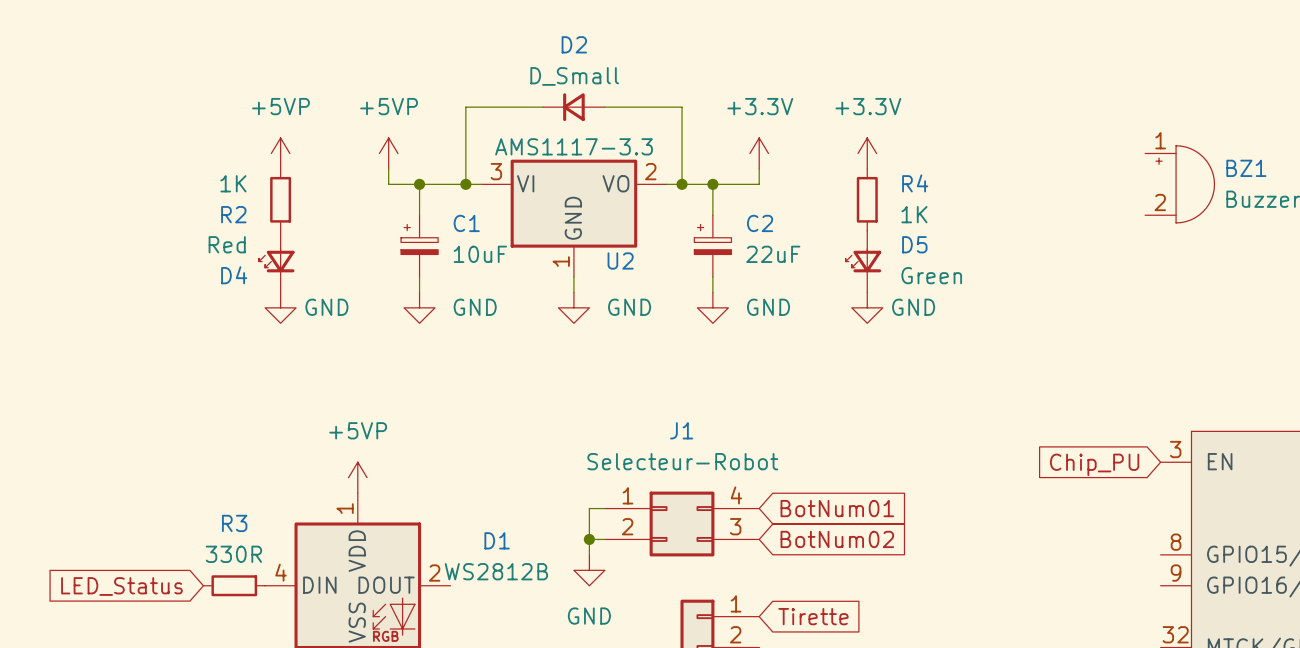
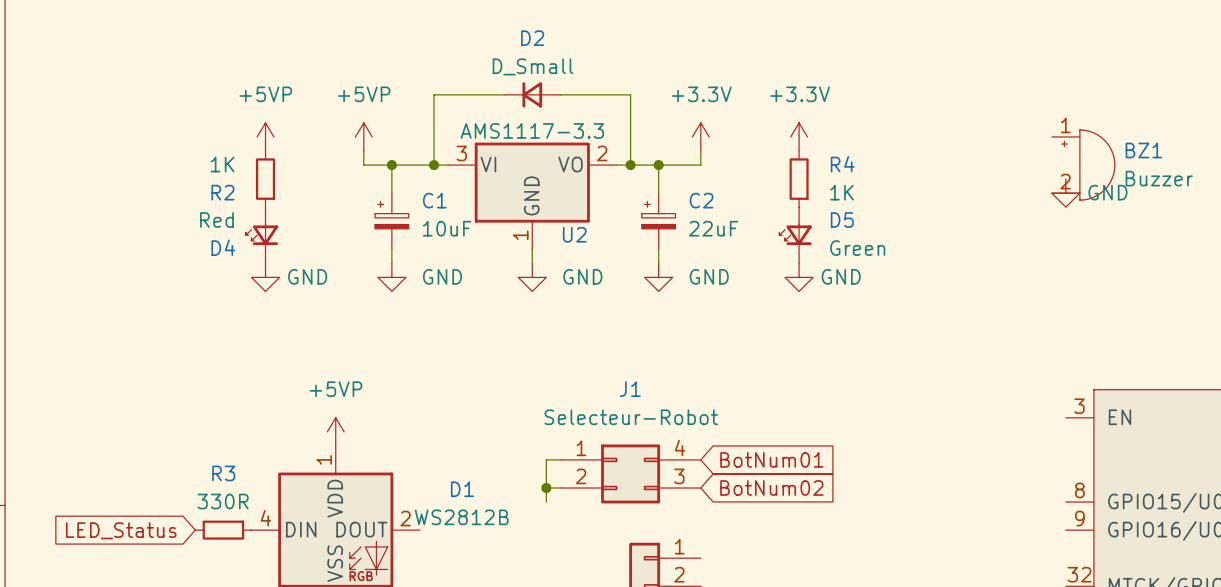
power symbol: none -> GND (1065, 193)
global label: Chip_PU (1094, 464) -> none
power symbol: GND (589, 570) -> none
global label: Tirette (813, 616) -> none

